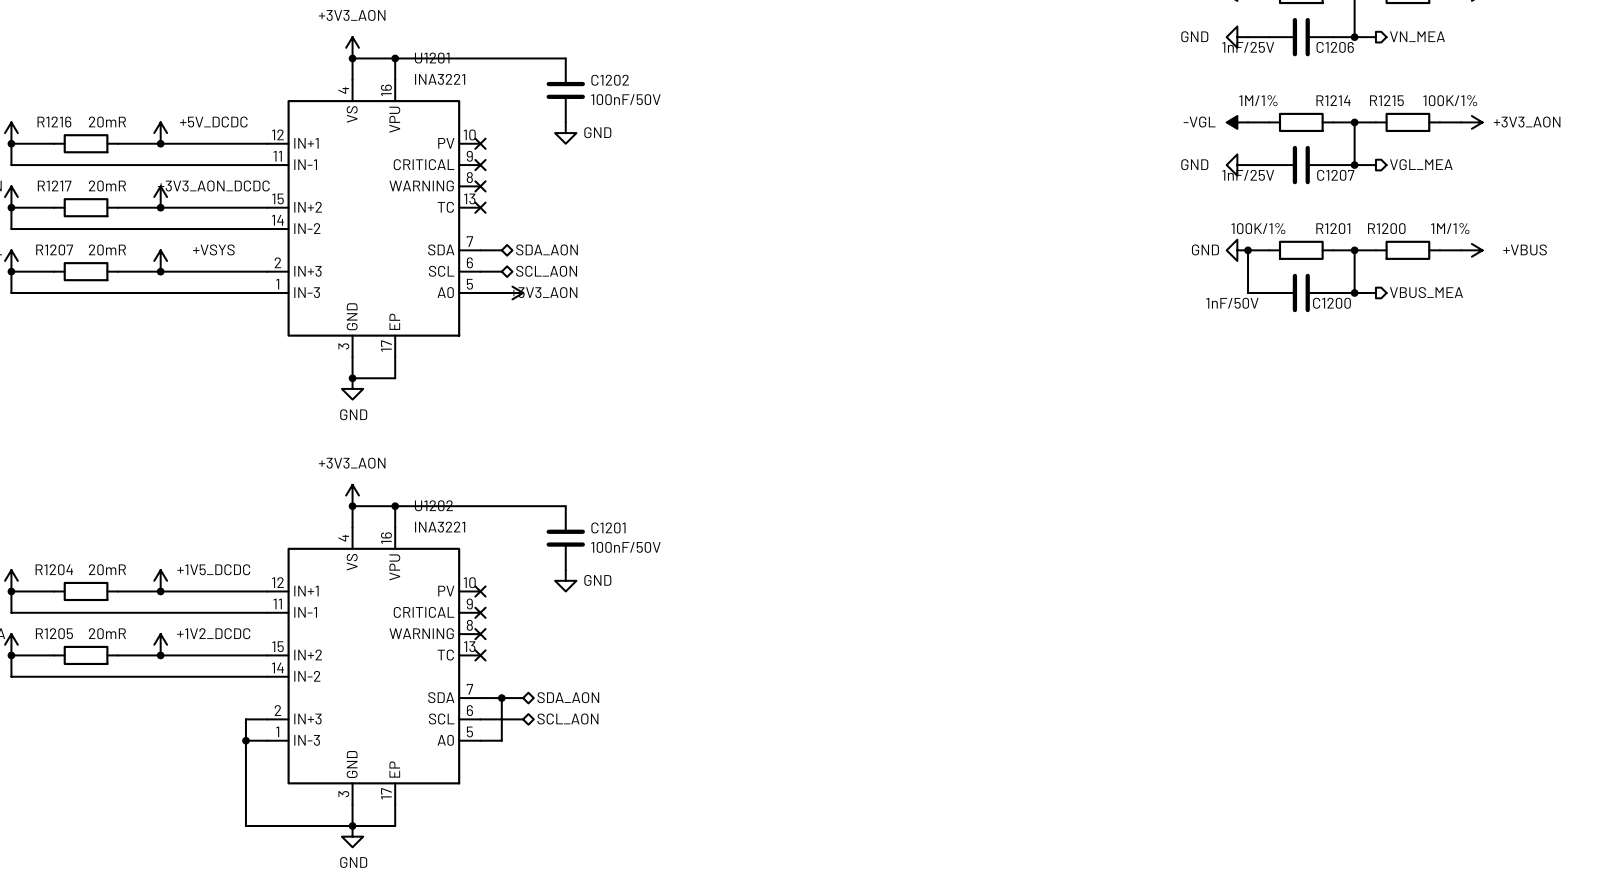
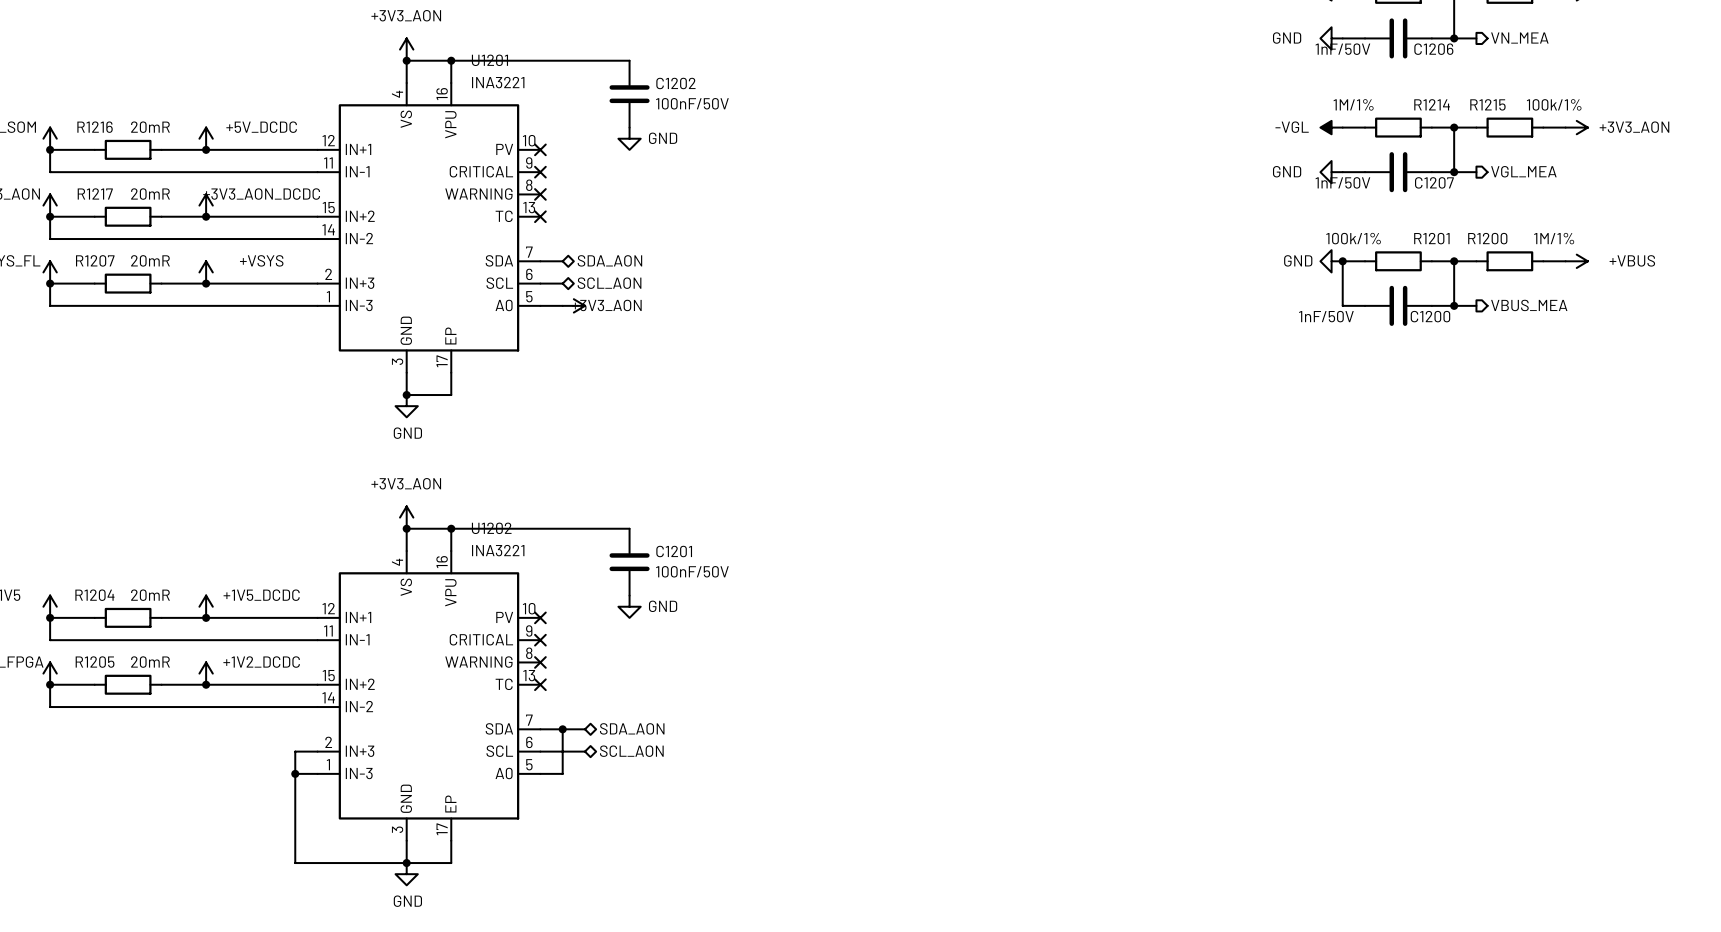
C1206 value: 1nF/25V (1248, 47) -> 1nF/50V (1342, 49)
R1215 value: 100K/1% (1450, 100) -> 100k/1% (1554, 104)
C1207 value: 1nF/25V (1248, 175) -> 1nF/50V (1342, 182)
R1201 value: 100K/1% (1258, 228) -> 100k/1% (1353, 238)

